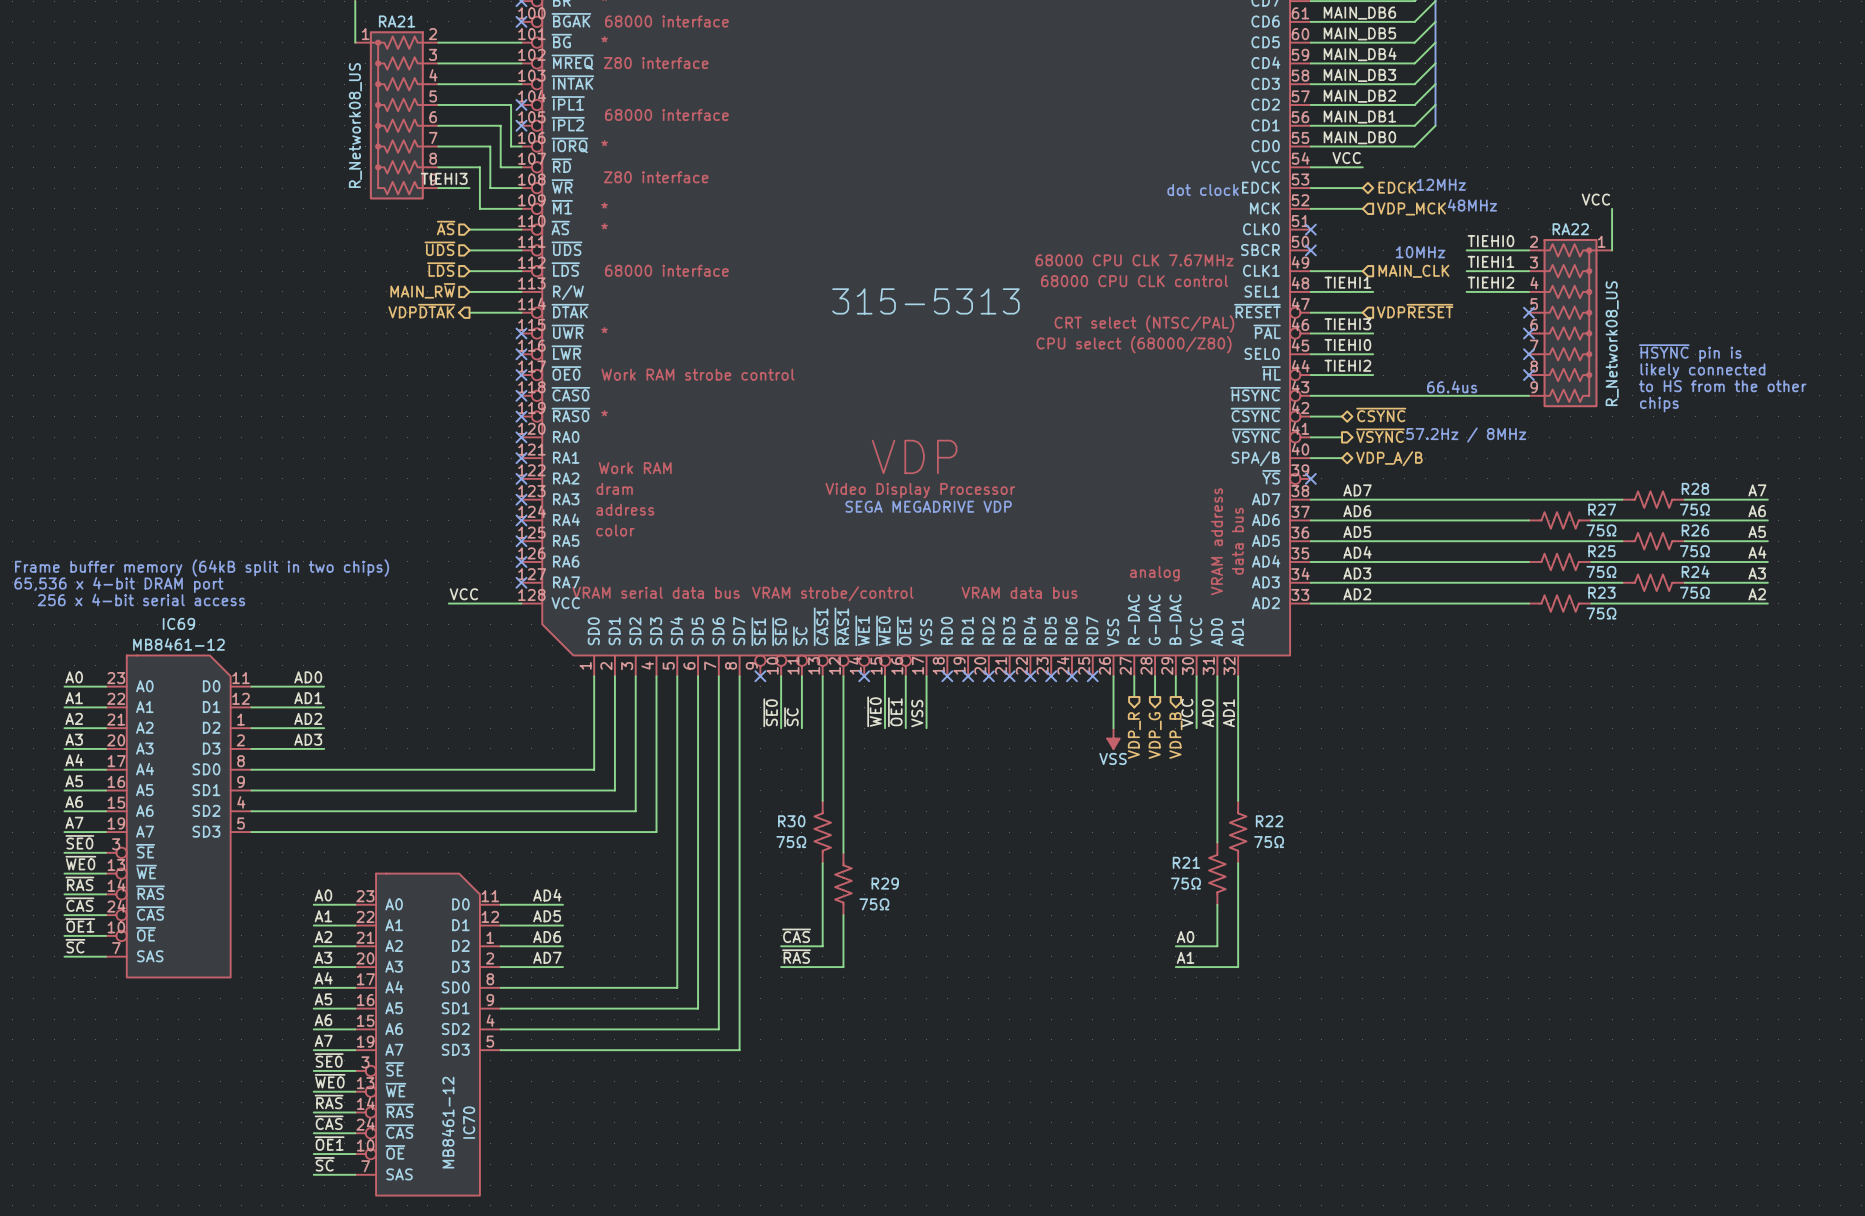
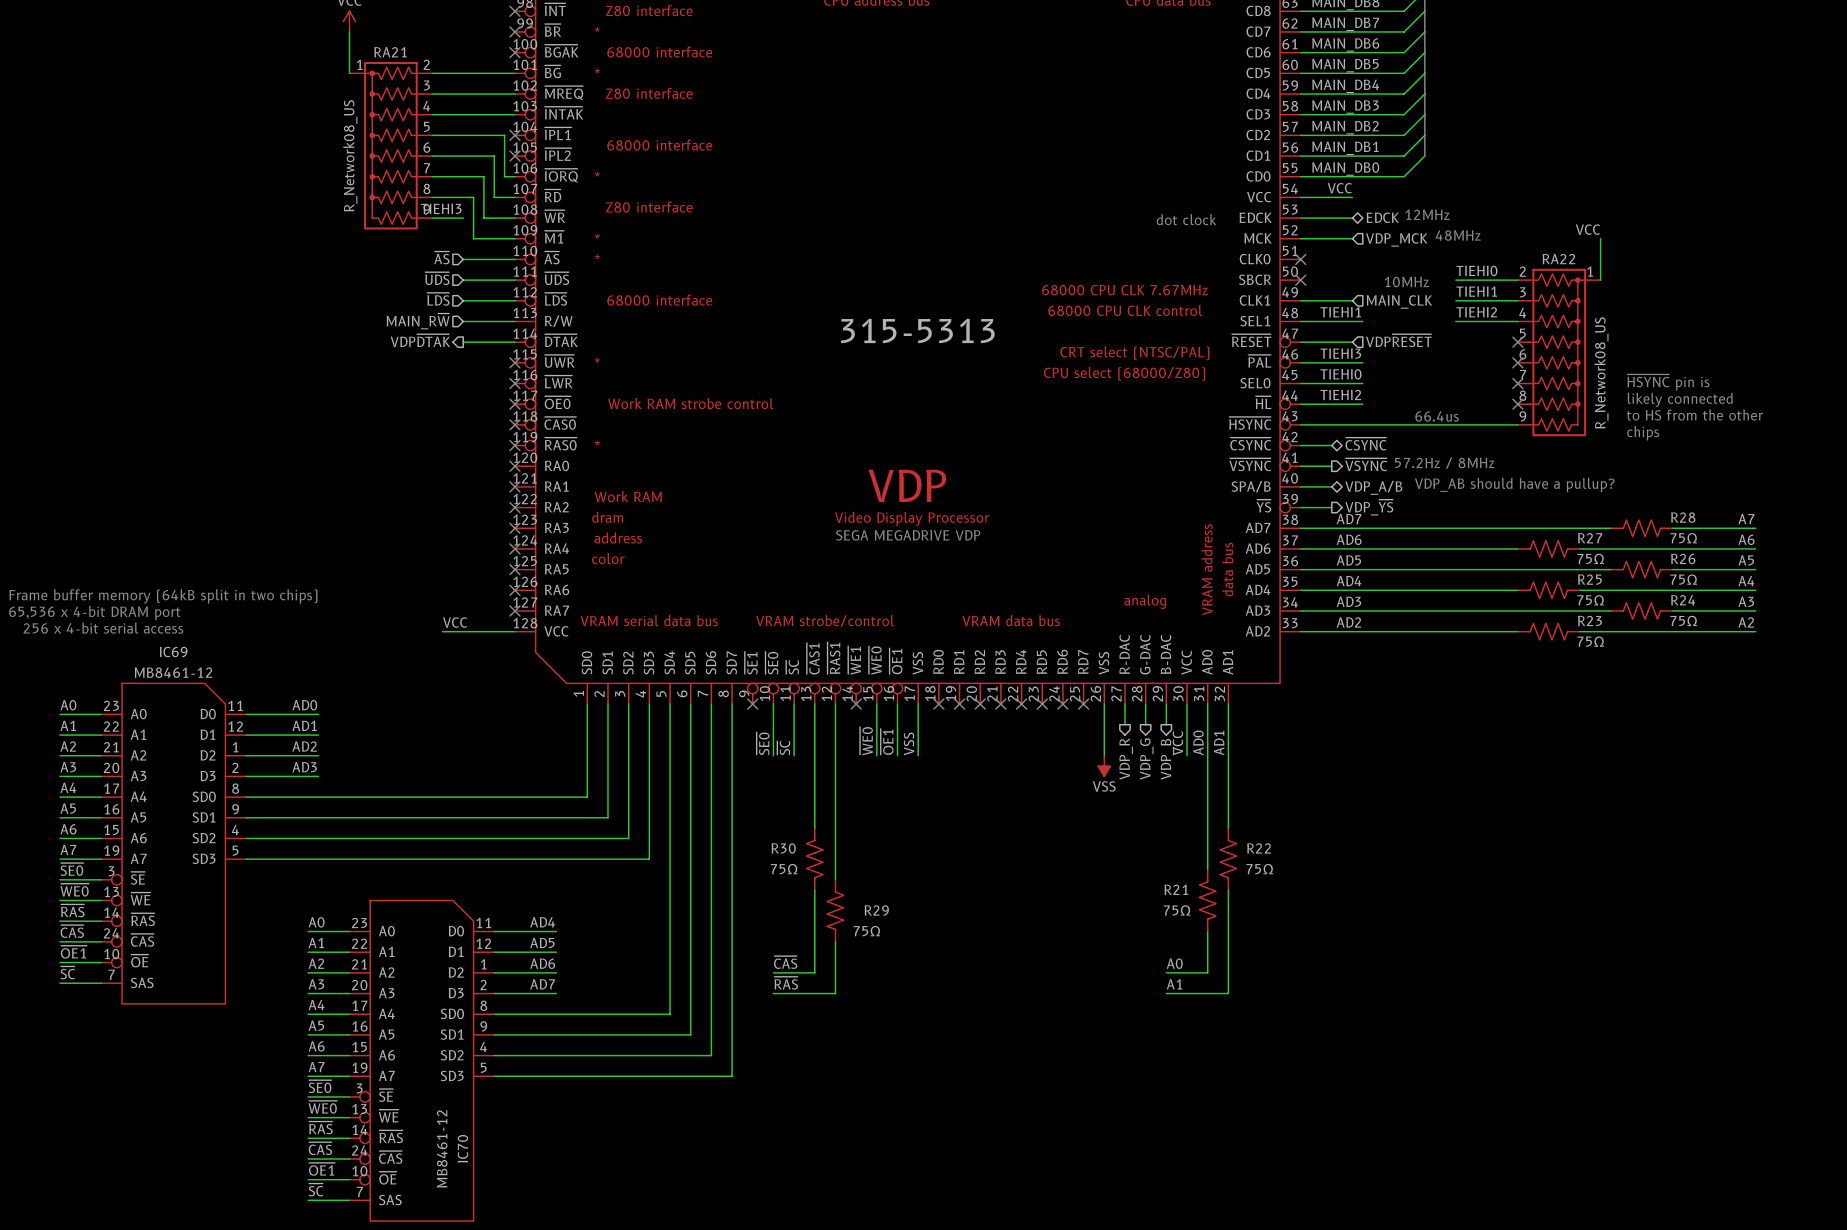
text: none -> VDP_AB should have a pullup? (1514, 484)
hierarchical label: none -> VDP_~{YS} (1369, 507)
wire: none -> (1300, 507) (1331, 507)
no-connect mark: (1310, 478) -> none

